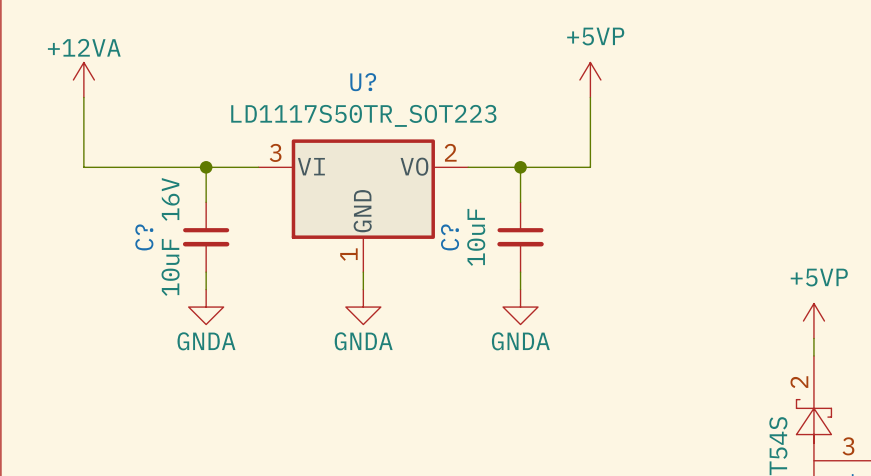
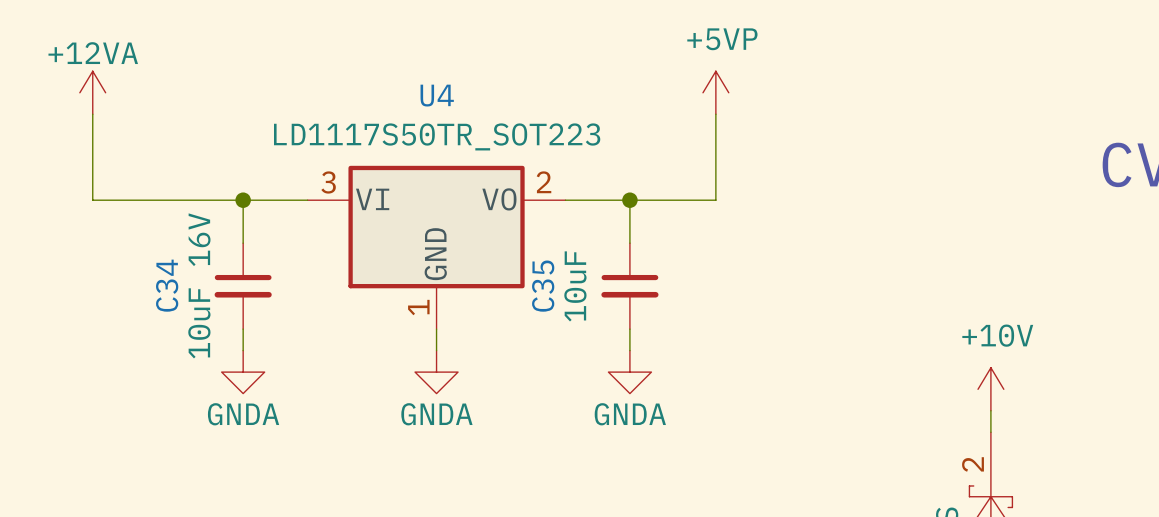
U? name: U? (363, 82) -> U4 (437, 95)
C? name: C? (144, 237) -> C34 (167, 285)
C? name: C? (450, 237) -> C35 (543, 286)
power symbol: +5VP (813, 321) -> +10V (990, 389)

